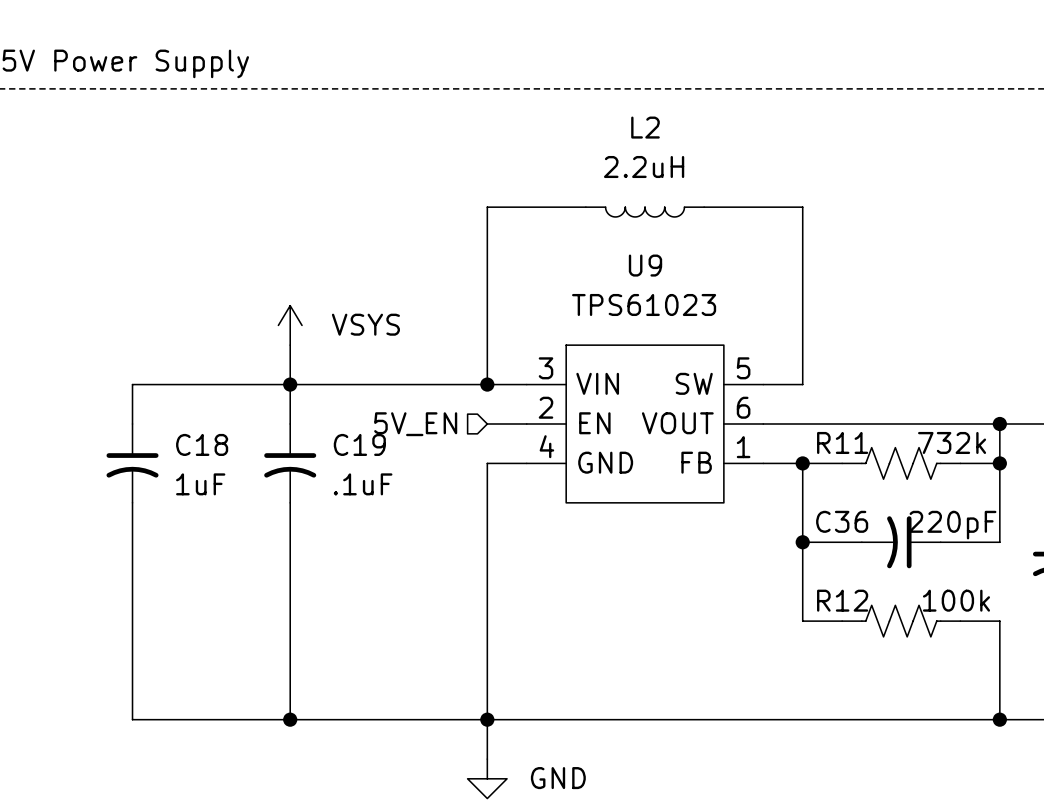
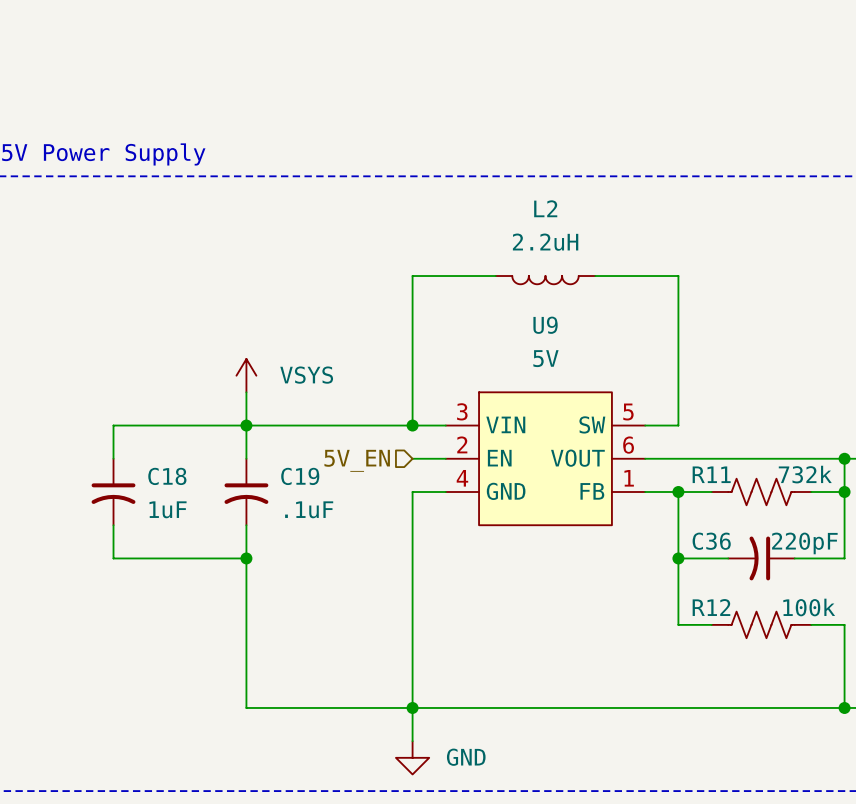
U9 value: TPS61023 (644, 304) -> 5V (545, 358)
wire: (132, 542) (132, 719) (290, 719) -> (113, 558) (246, 558)
junction: none -> (246, 558)
junction: (290, 719) -> none

